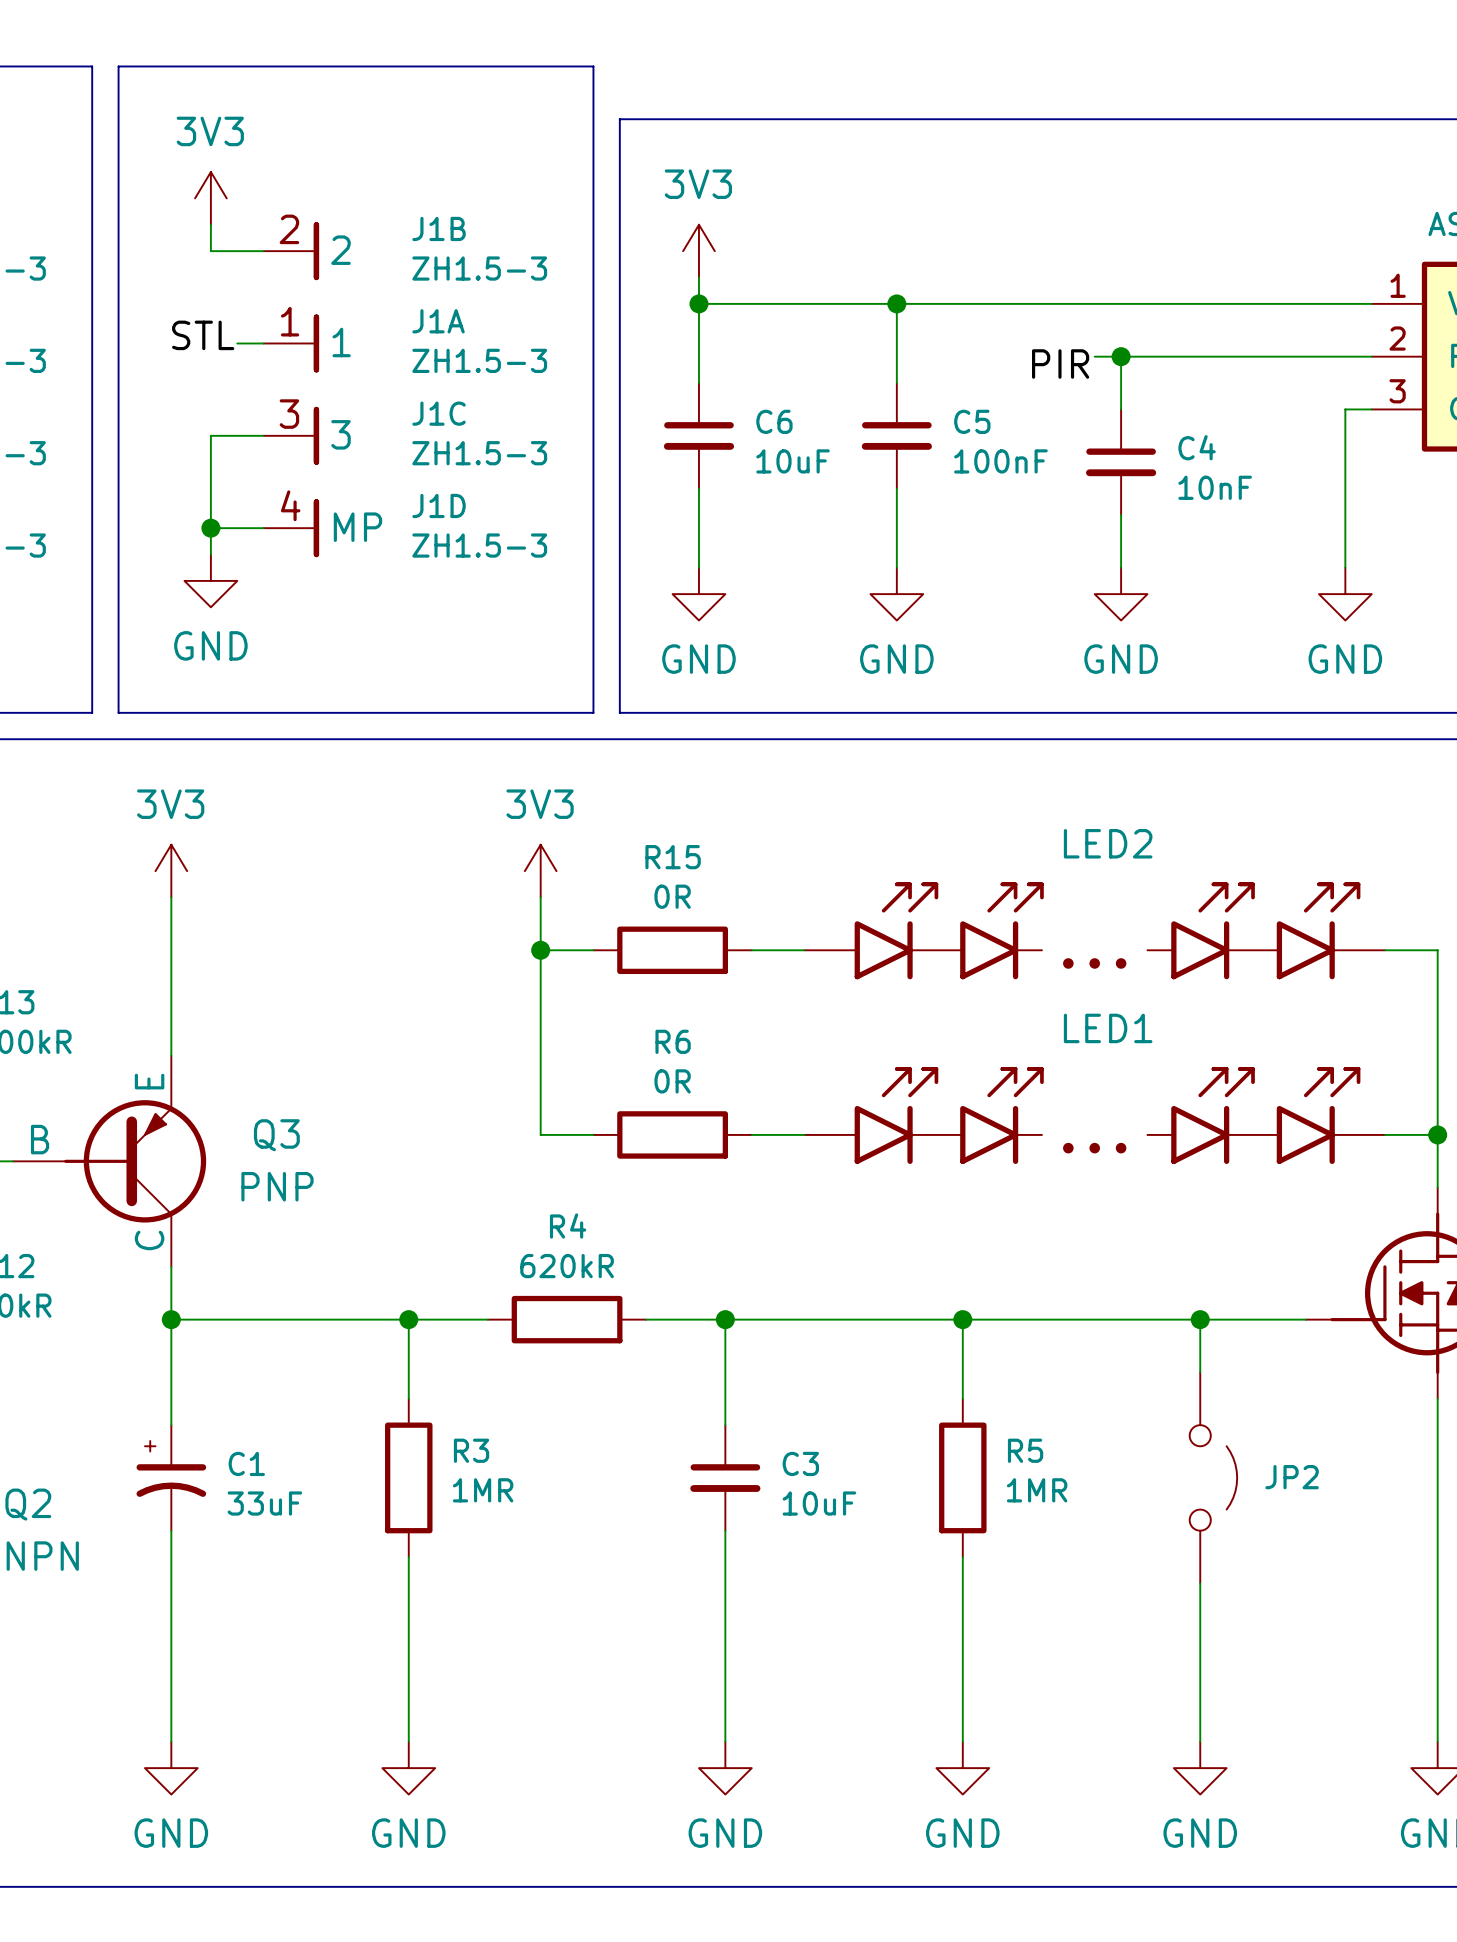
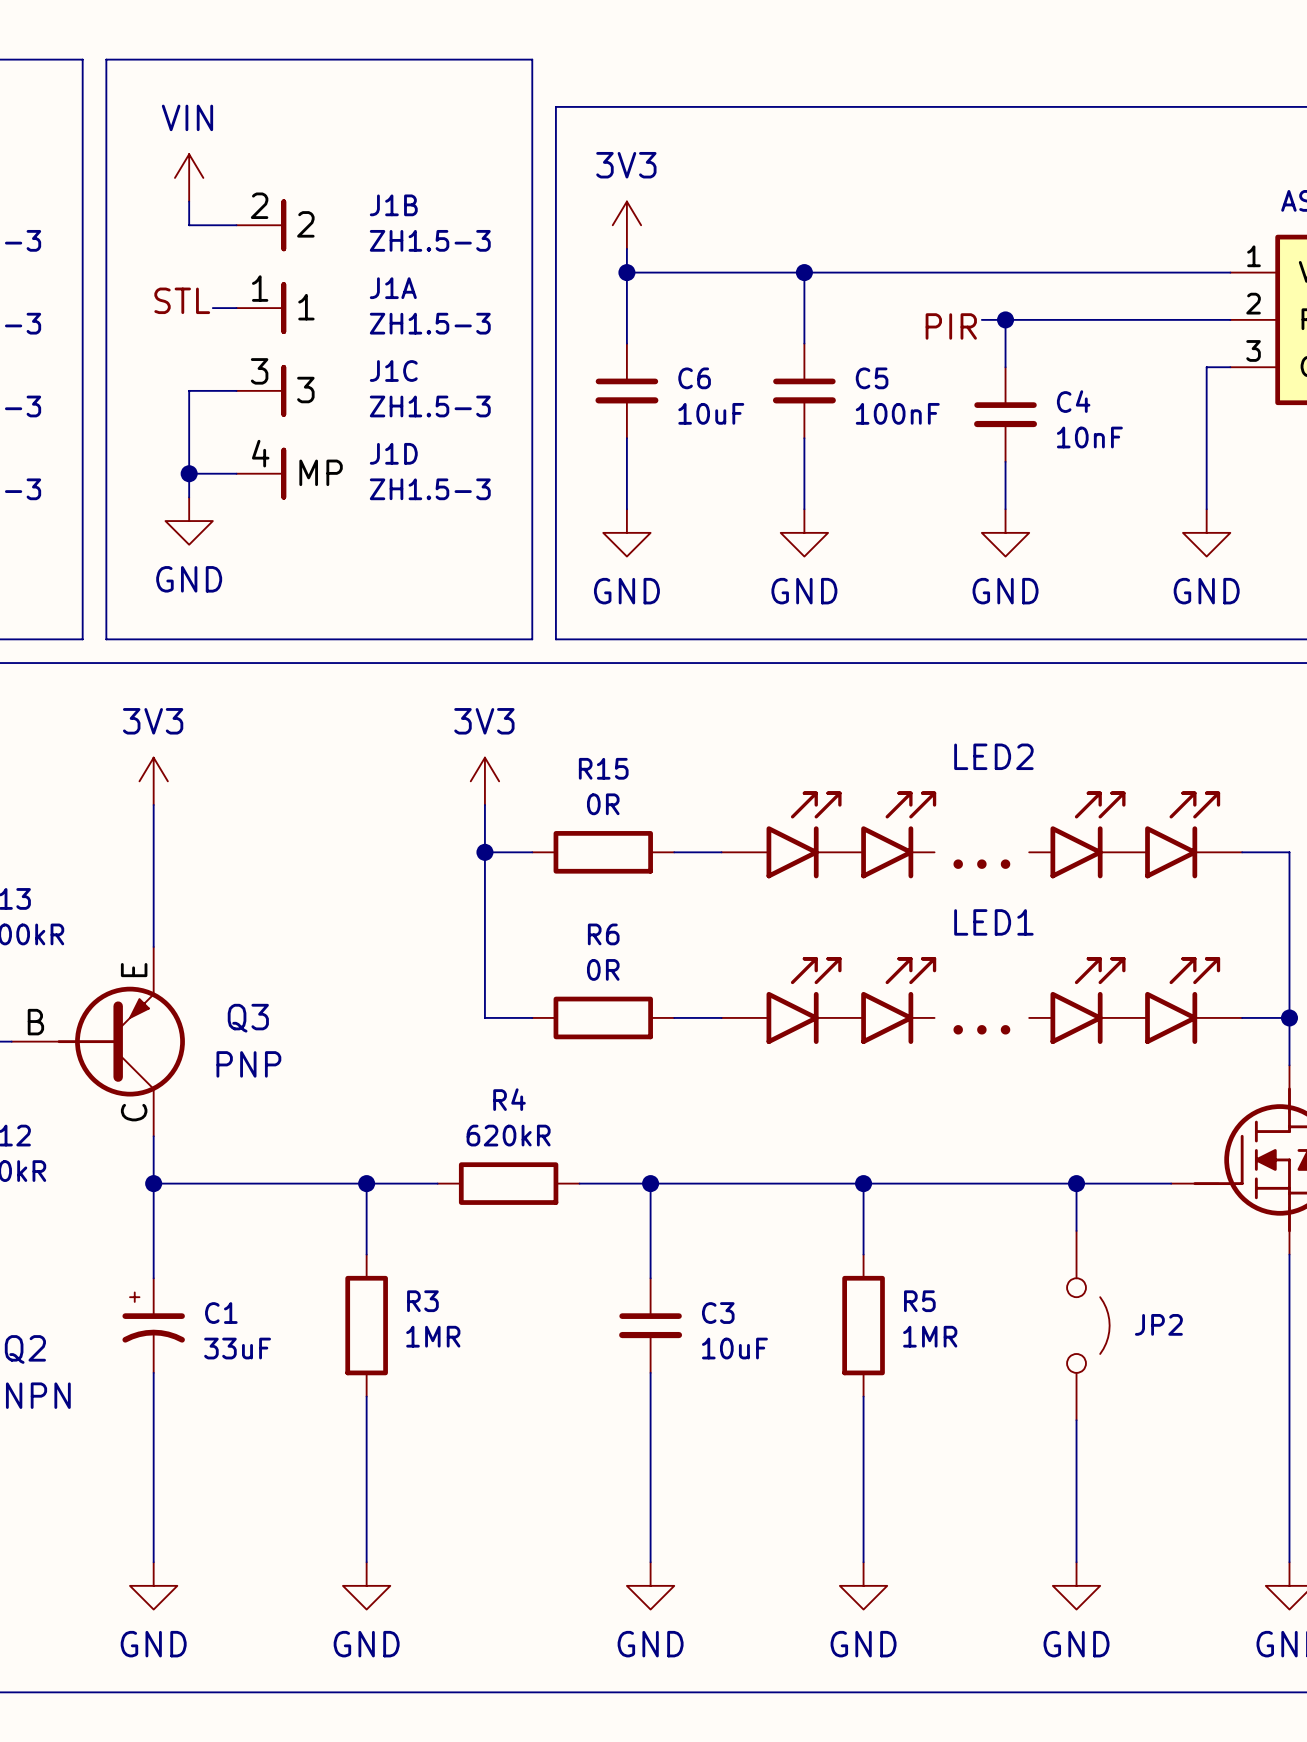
power symbol: 3V3 (210, 198) -> VIN (189, 177)

